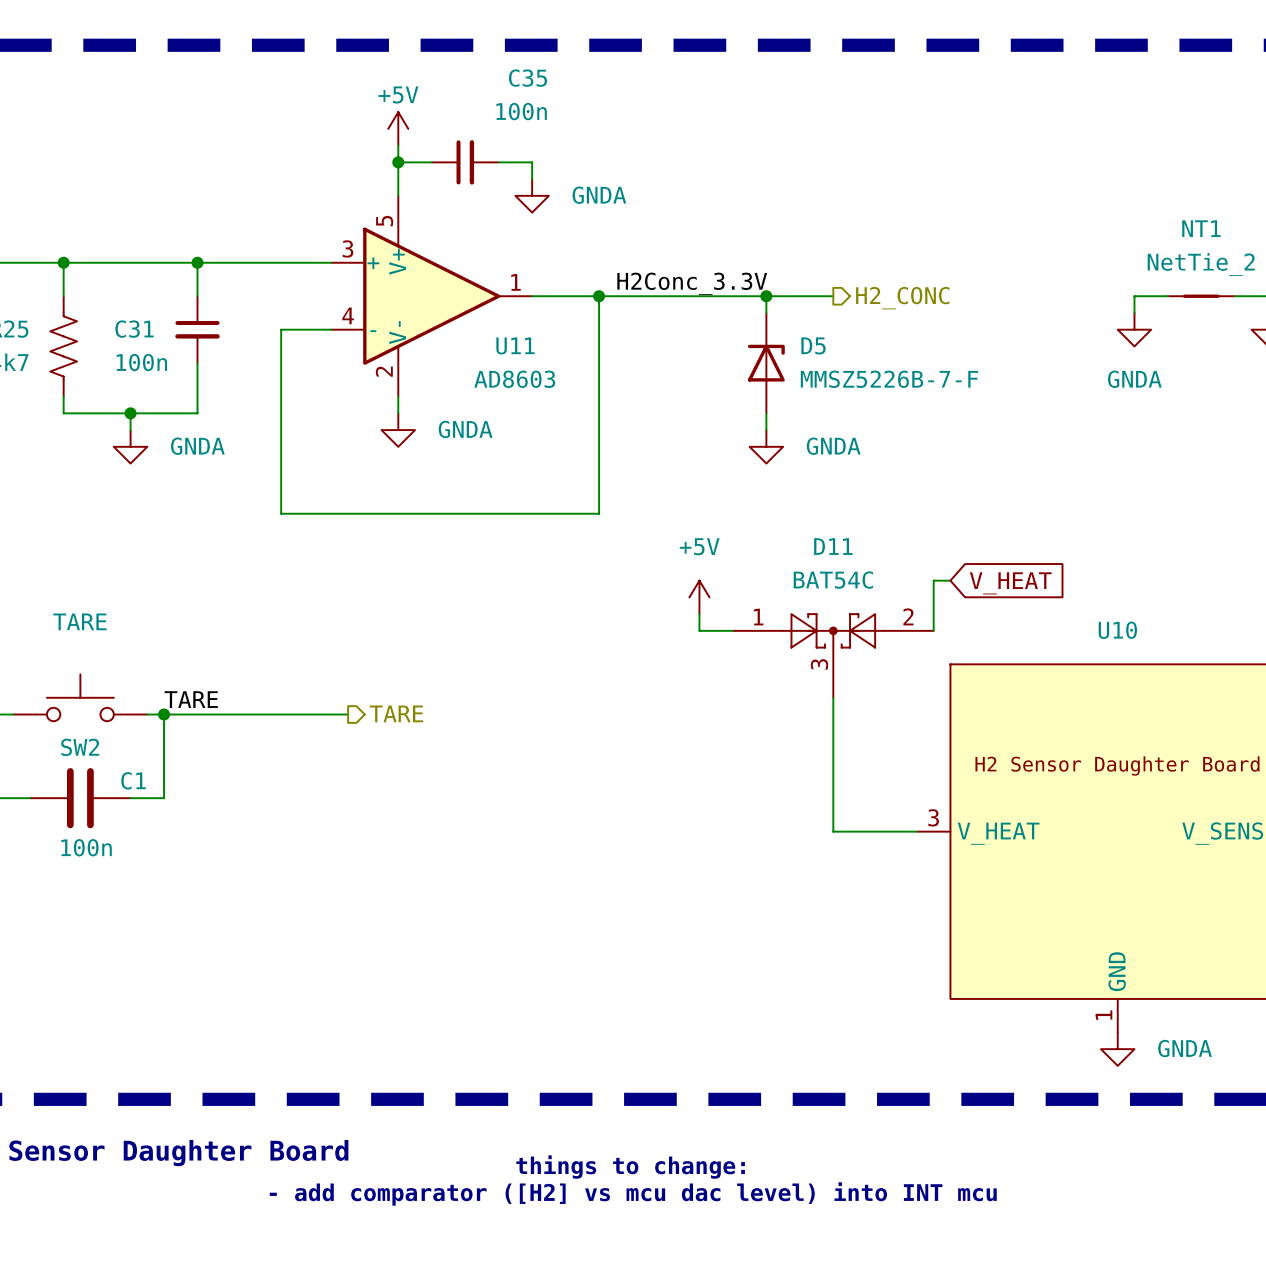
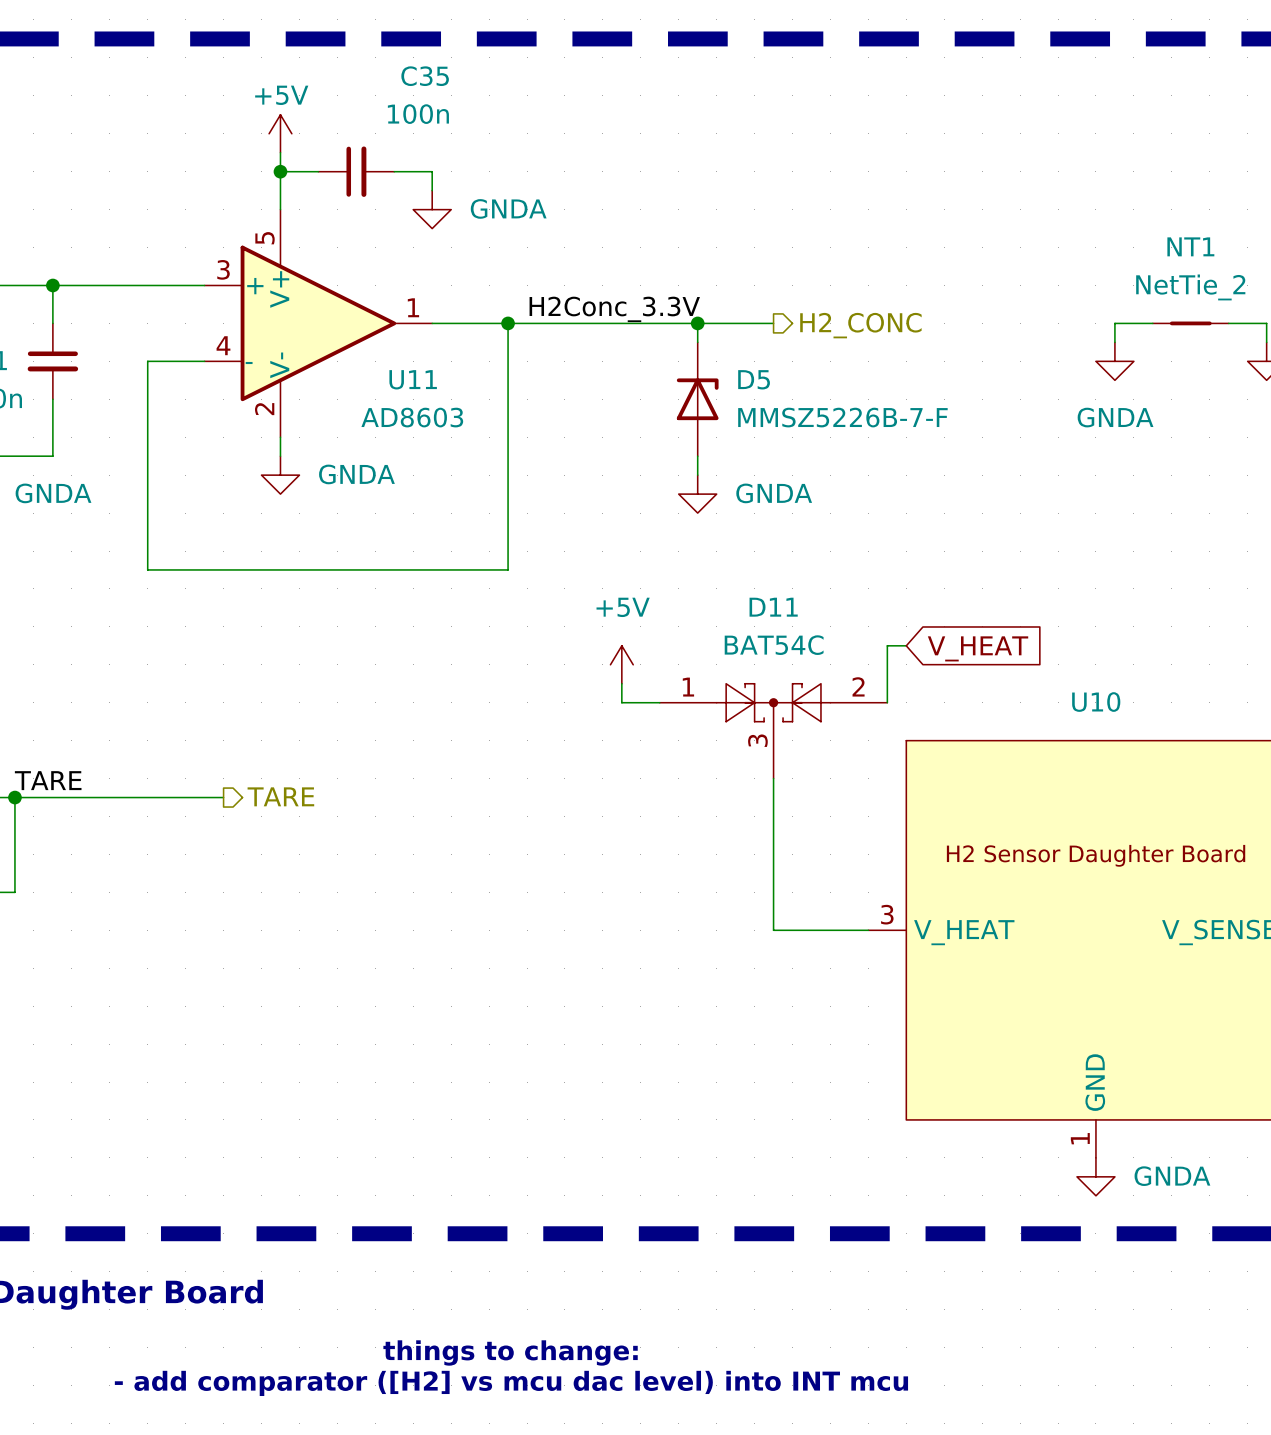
text position: things to change: (630, 1167) -> things to change: (510, 1352)
text position: - add comparator ([H2] vs mcu dac level) into INT mcu (633, 1193) -> - add comparator ([H2] vs mcu dac level) into INT mcu (511, 1383)

